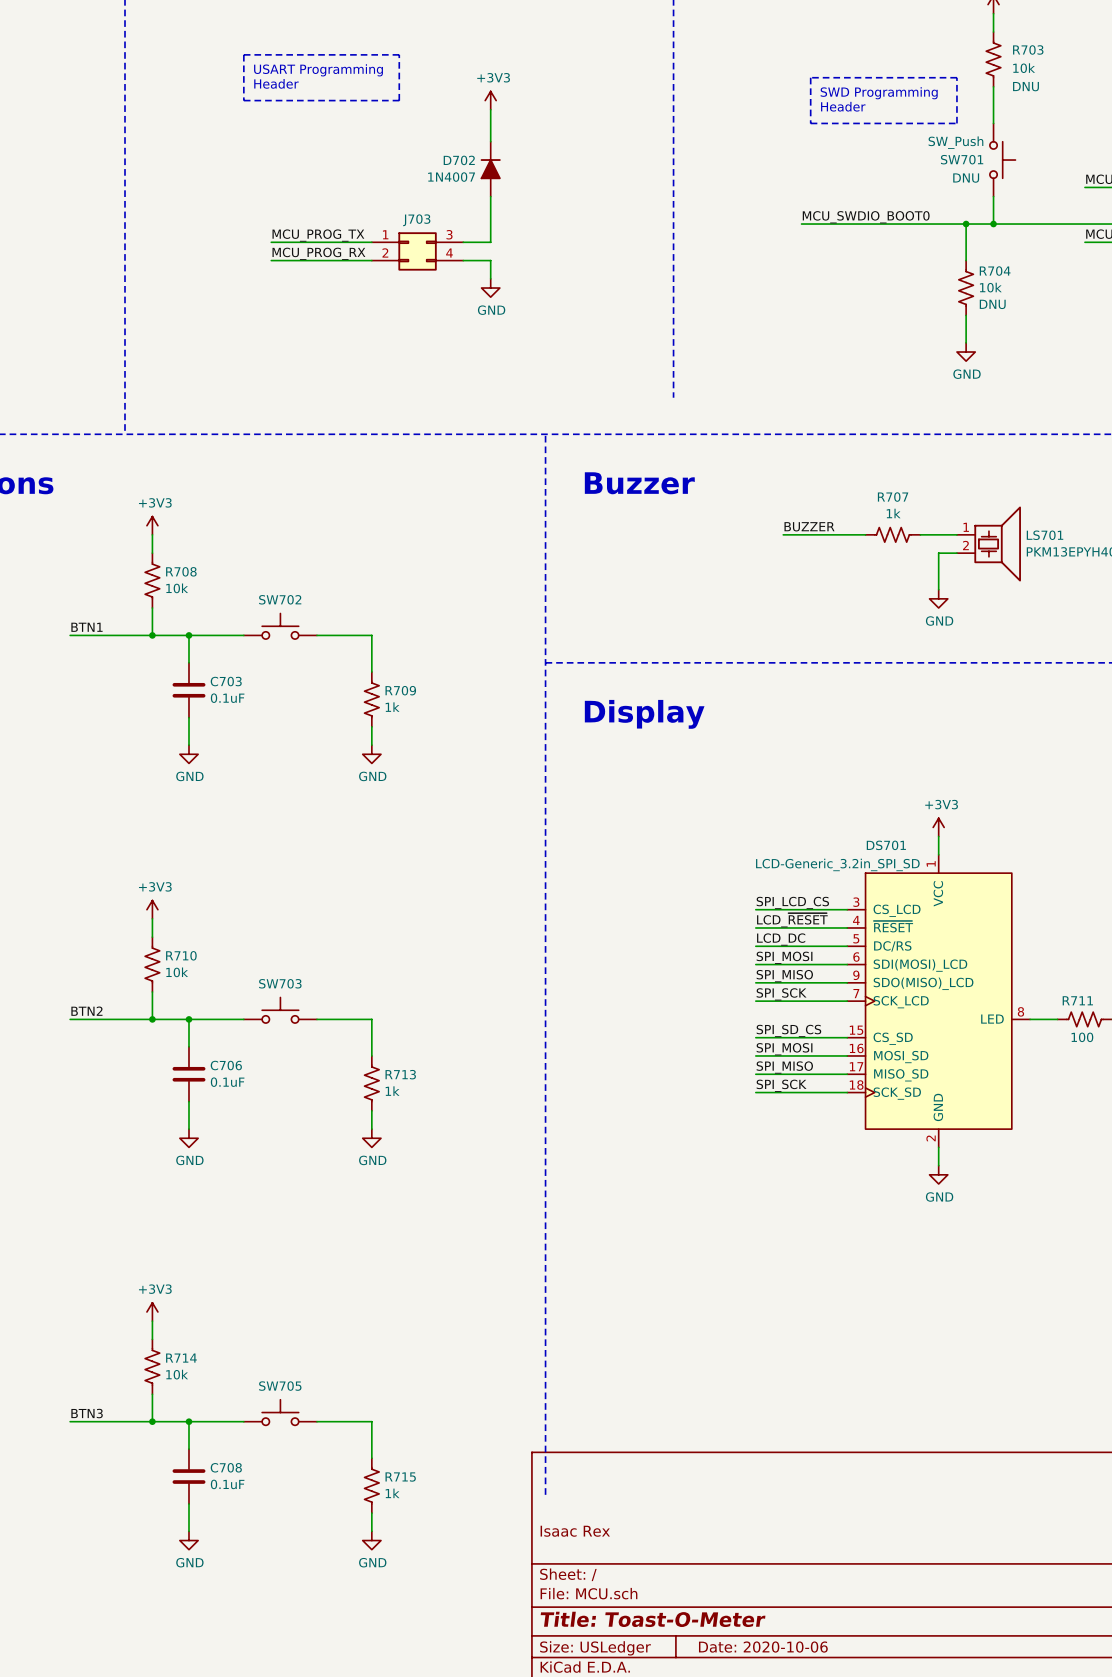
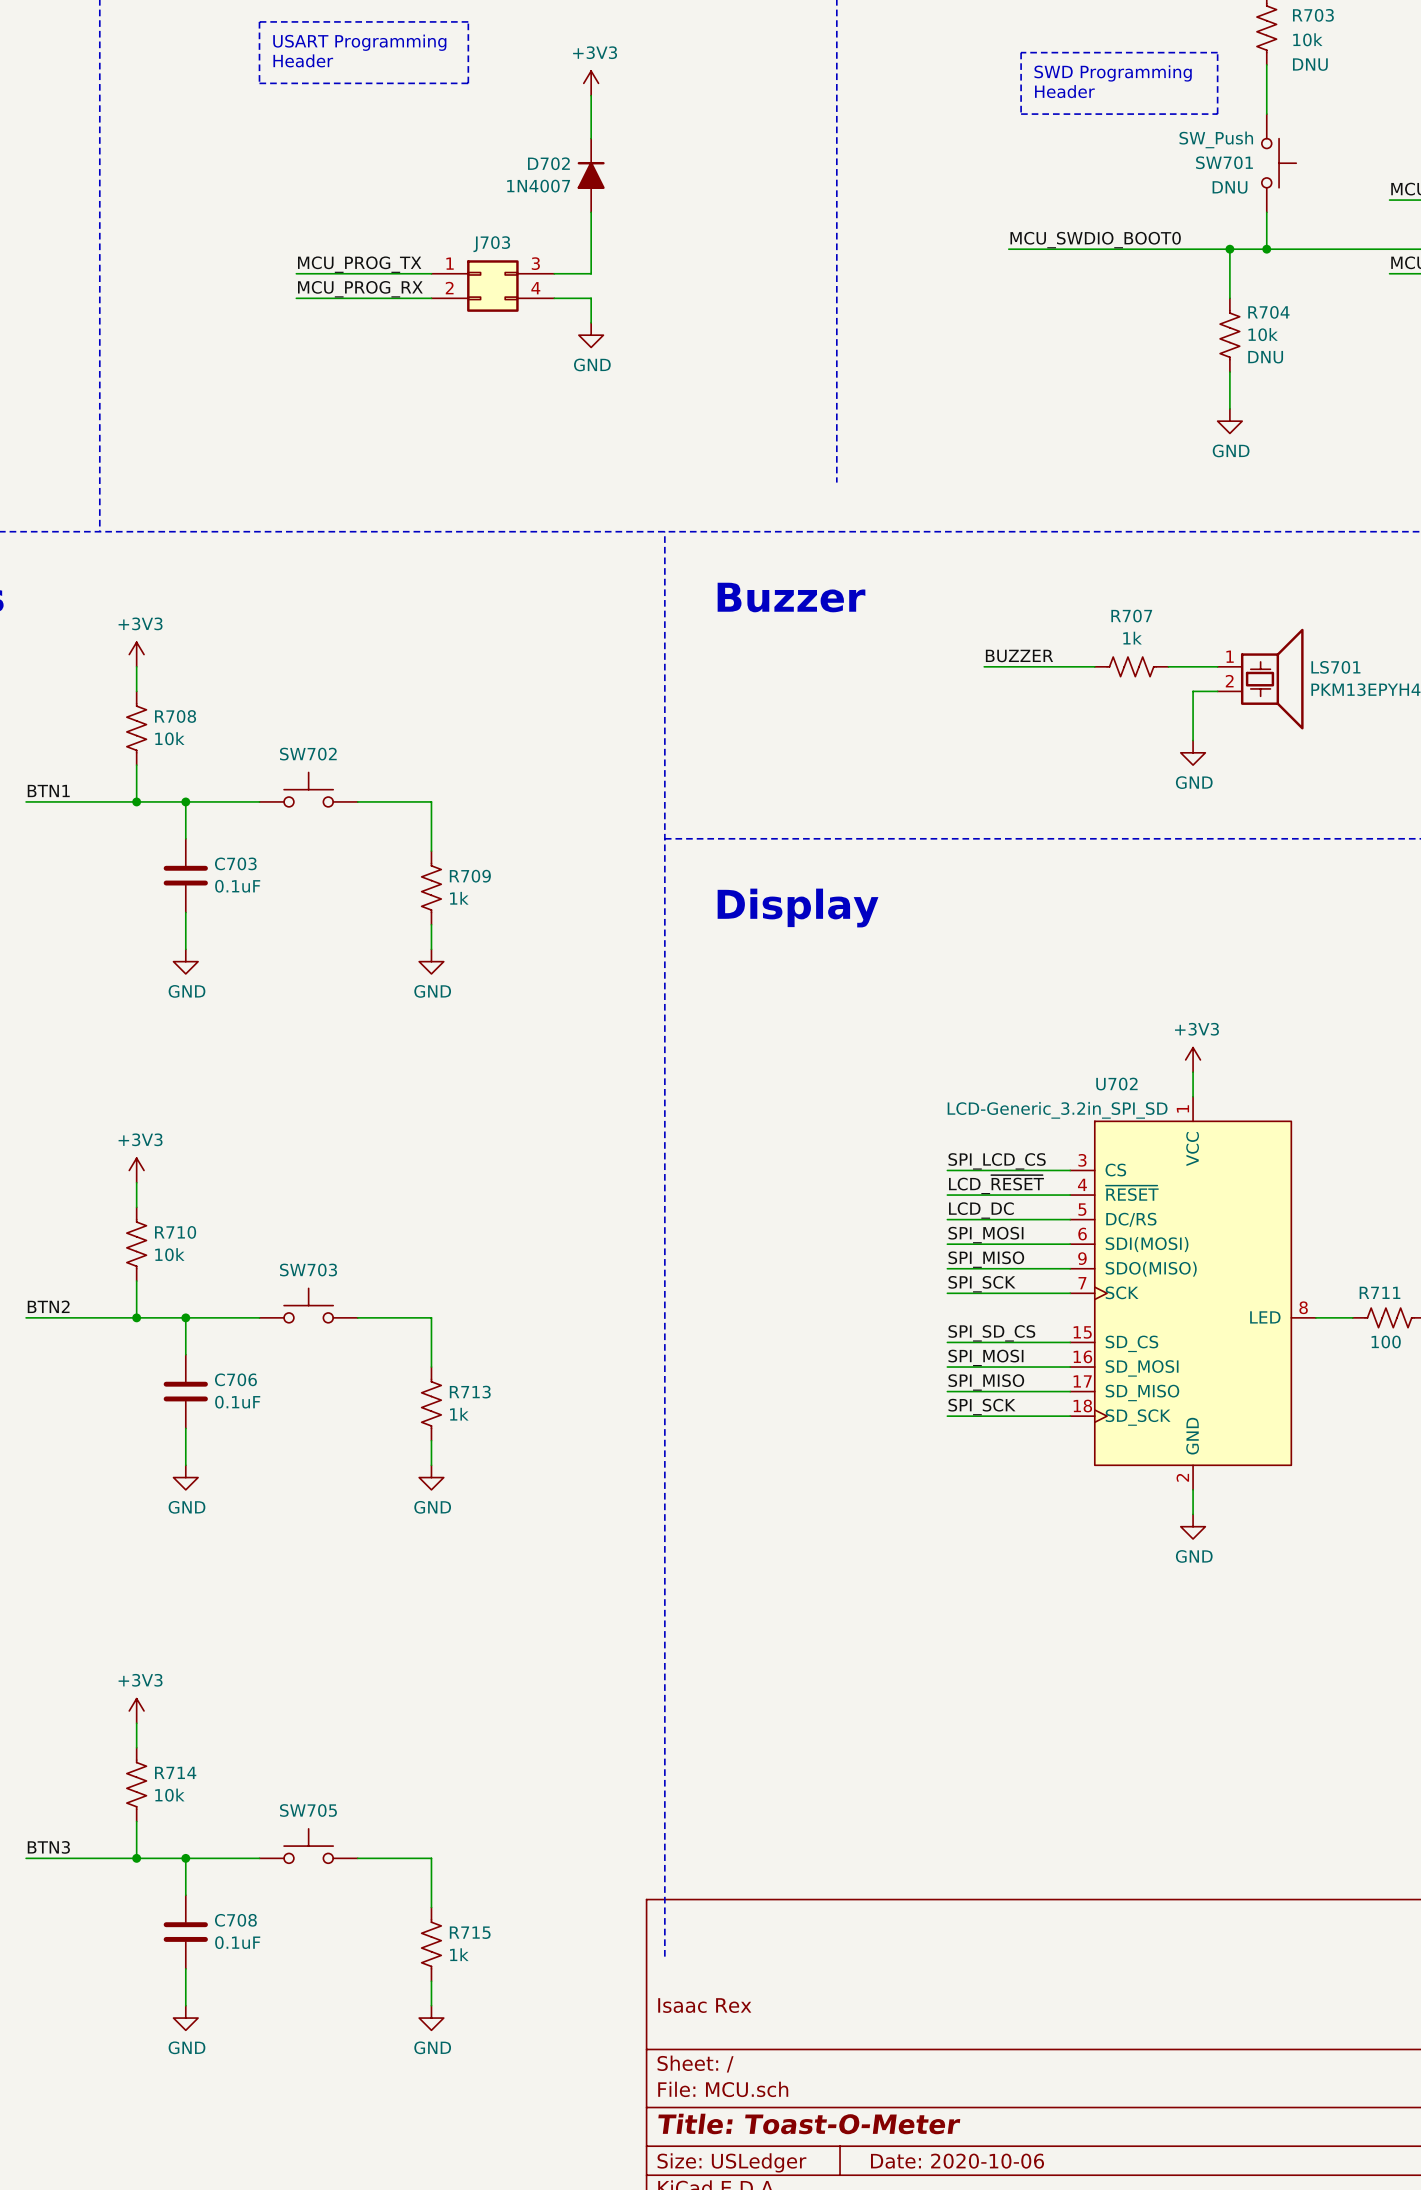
DS701 name: DS701 (886, 845) -> U702 (1116, 1084)
DS701 pin name: CS_LCD (897, 910) -> CS (1115, 1170)
DS701 pin name: SDI(MOSI)_LCD (920, 965) -> SDI(MOSI) (1147, 1244)
DS701 pin name: SDO(MISO)_LCD (923, 983) -> SDO(MISO) (1151, 1269)
DS701 pin name: SCK_LCD (901, 1002) -> SCK (1122, 1292)
DS701 pin name: CS_SD (893, 1038) -> SD_CS (1131, 1343)
DS701 pin name: MOSI_SD (901, 1057) -> SD_MOSI (1142, 1368)
DS701 pin name: MISO_SD (901, 1075) -> SD_MISO (1142, 1392)
DS701 pin name: SCK_SD (897, 1093) -> SD_SCK (1138, 1417)

